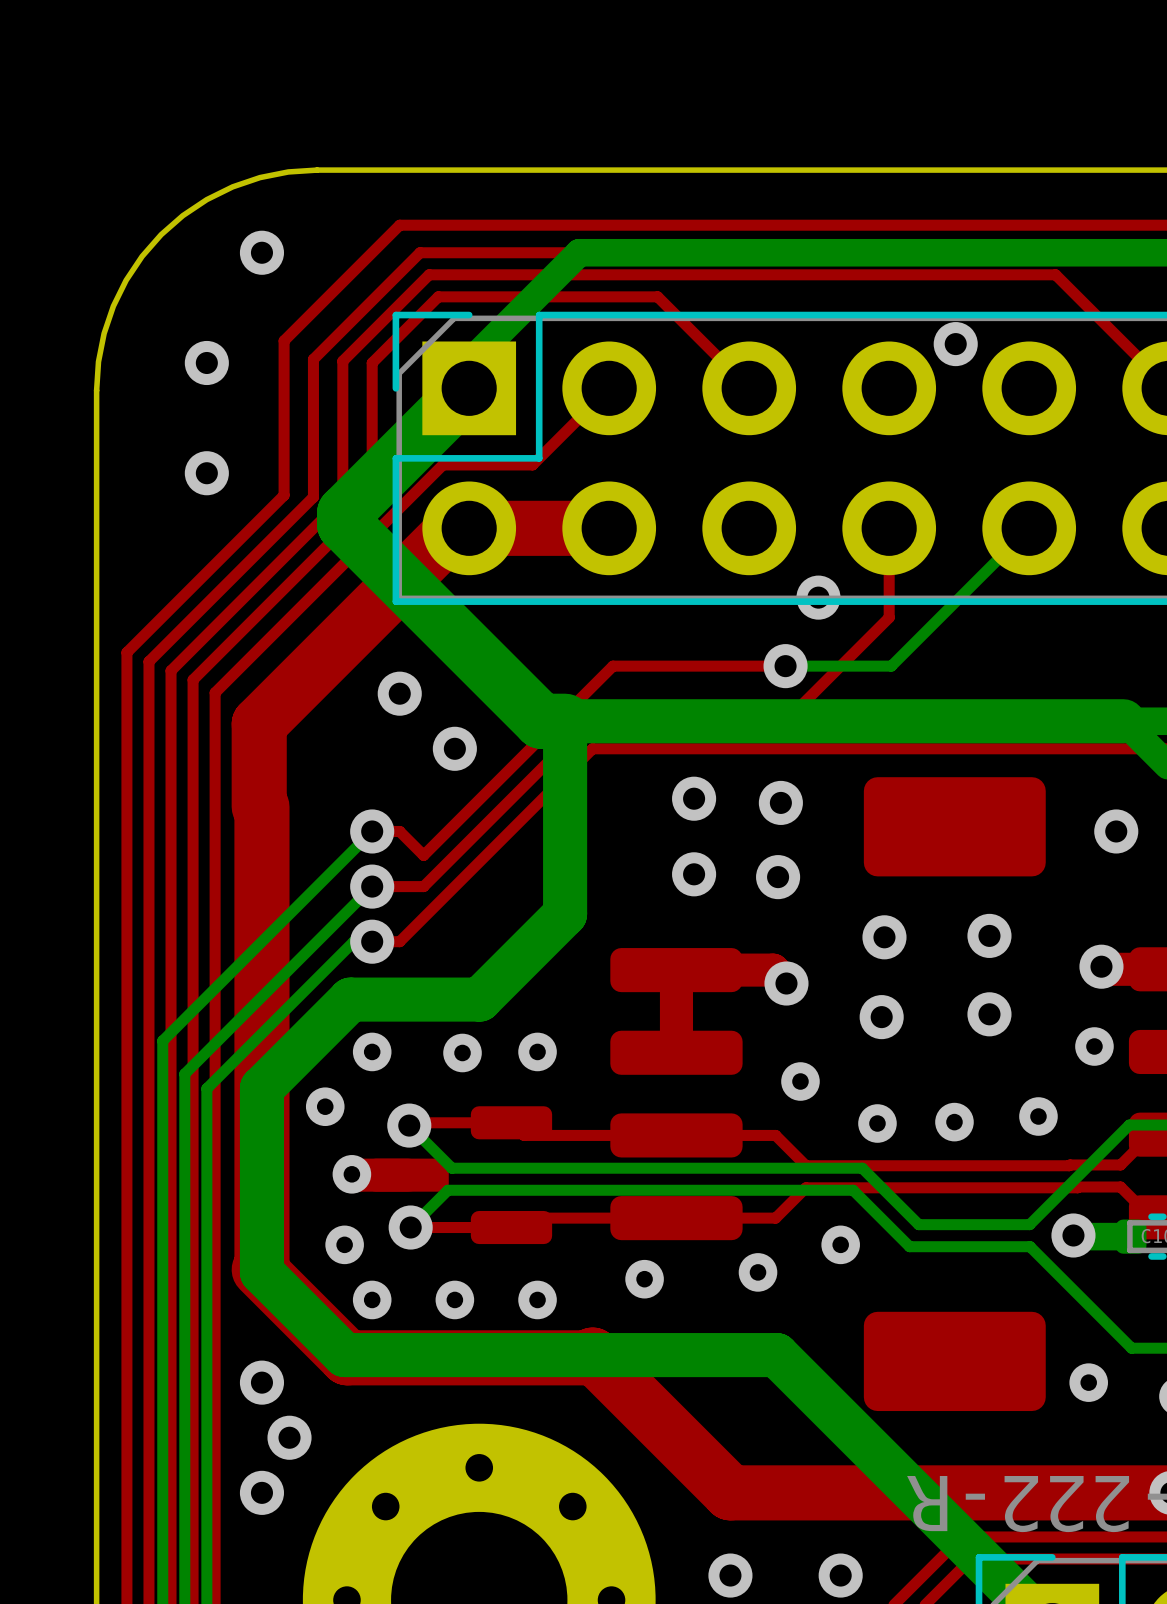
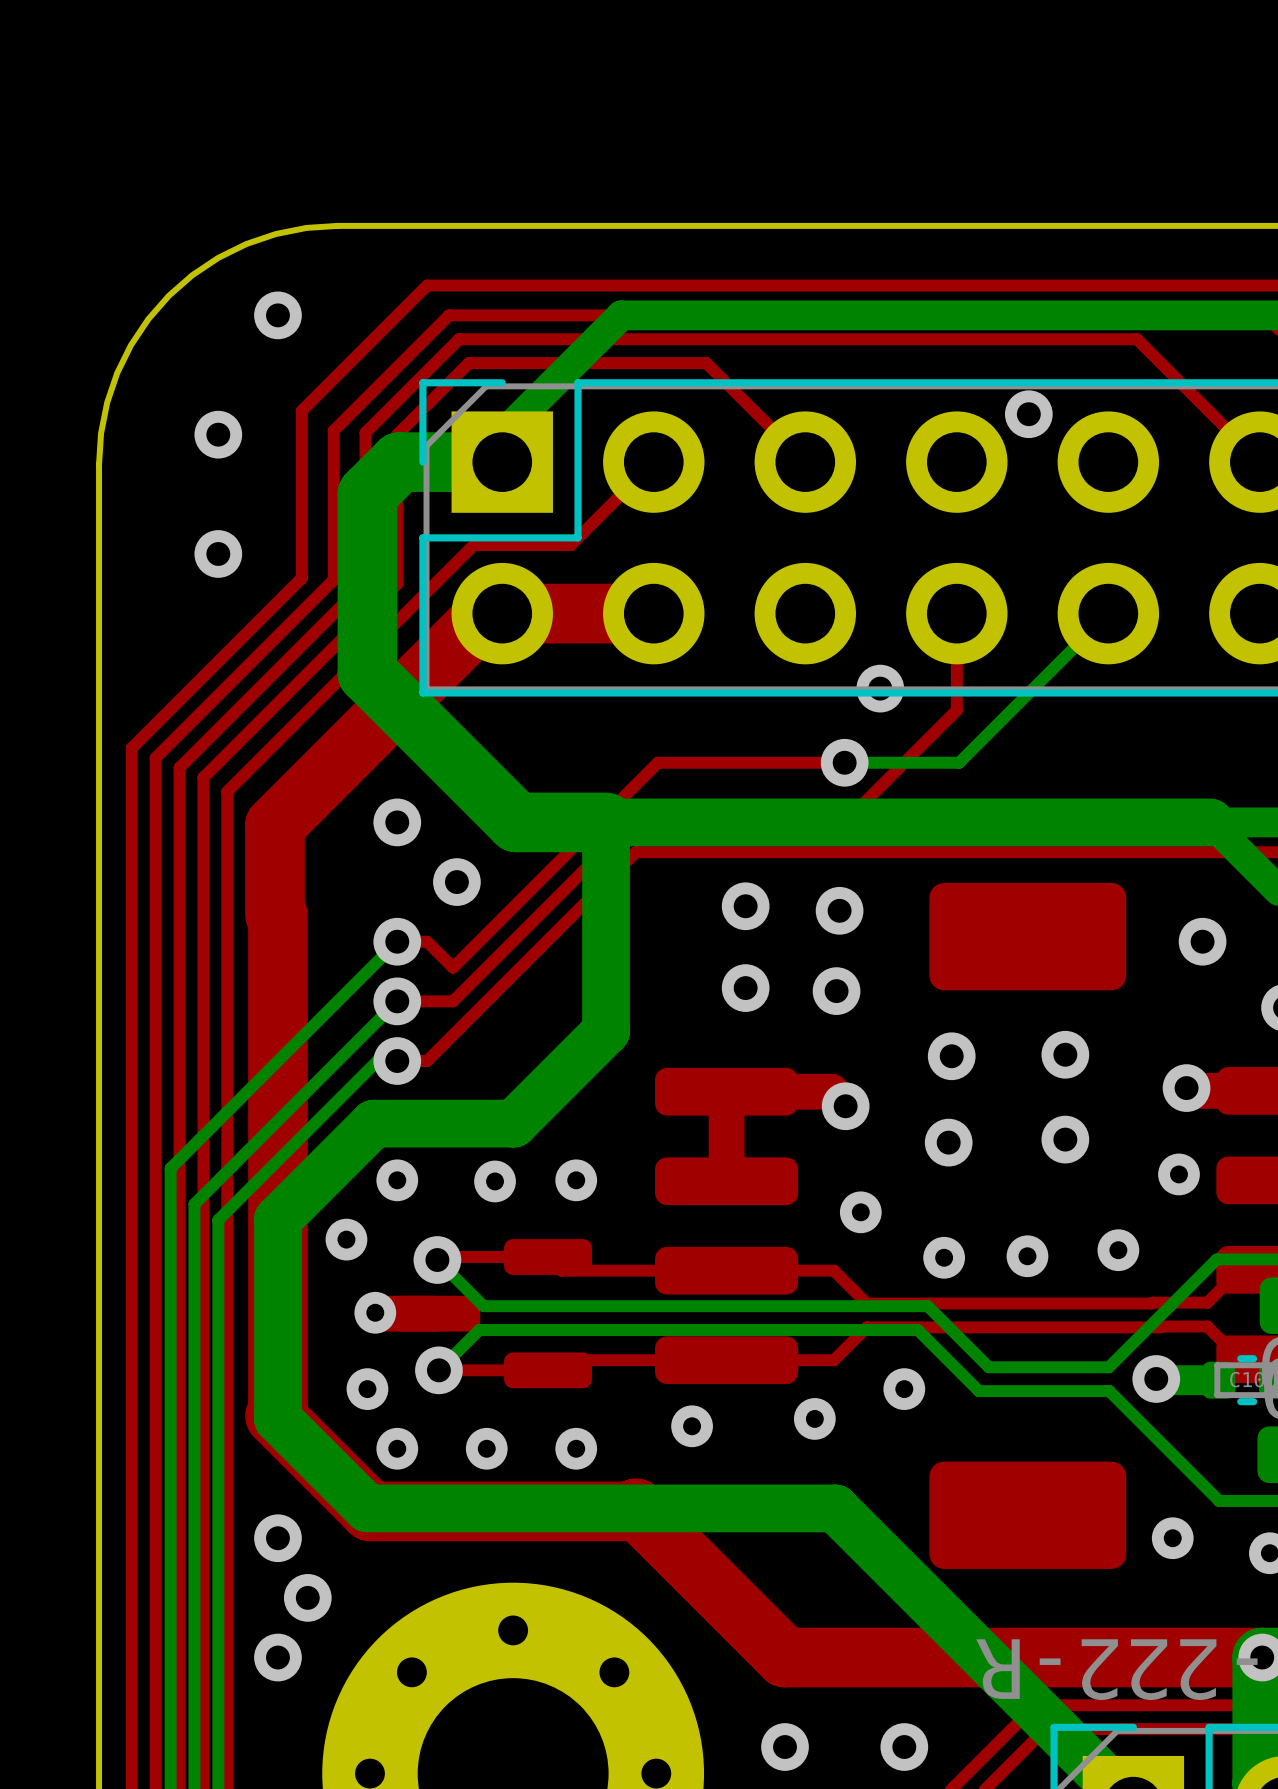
bottom track: (469, 388) (344, 512) -> (502, 462) (399, 462) (367, 494) (367, 596)
bottom track: (344, 524) (541, 721) -> (367, 609) (367, 673) (516, 822) (580, 822)
via position: (399, 693) -> (397, 822)
via position: (454, 748) -> (456, 882)

